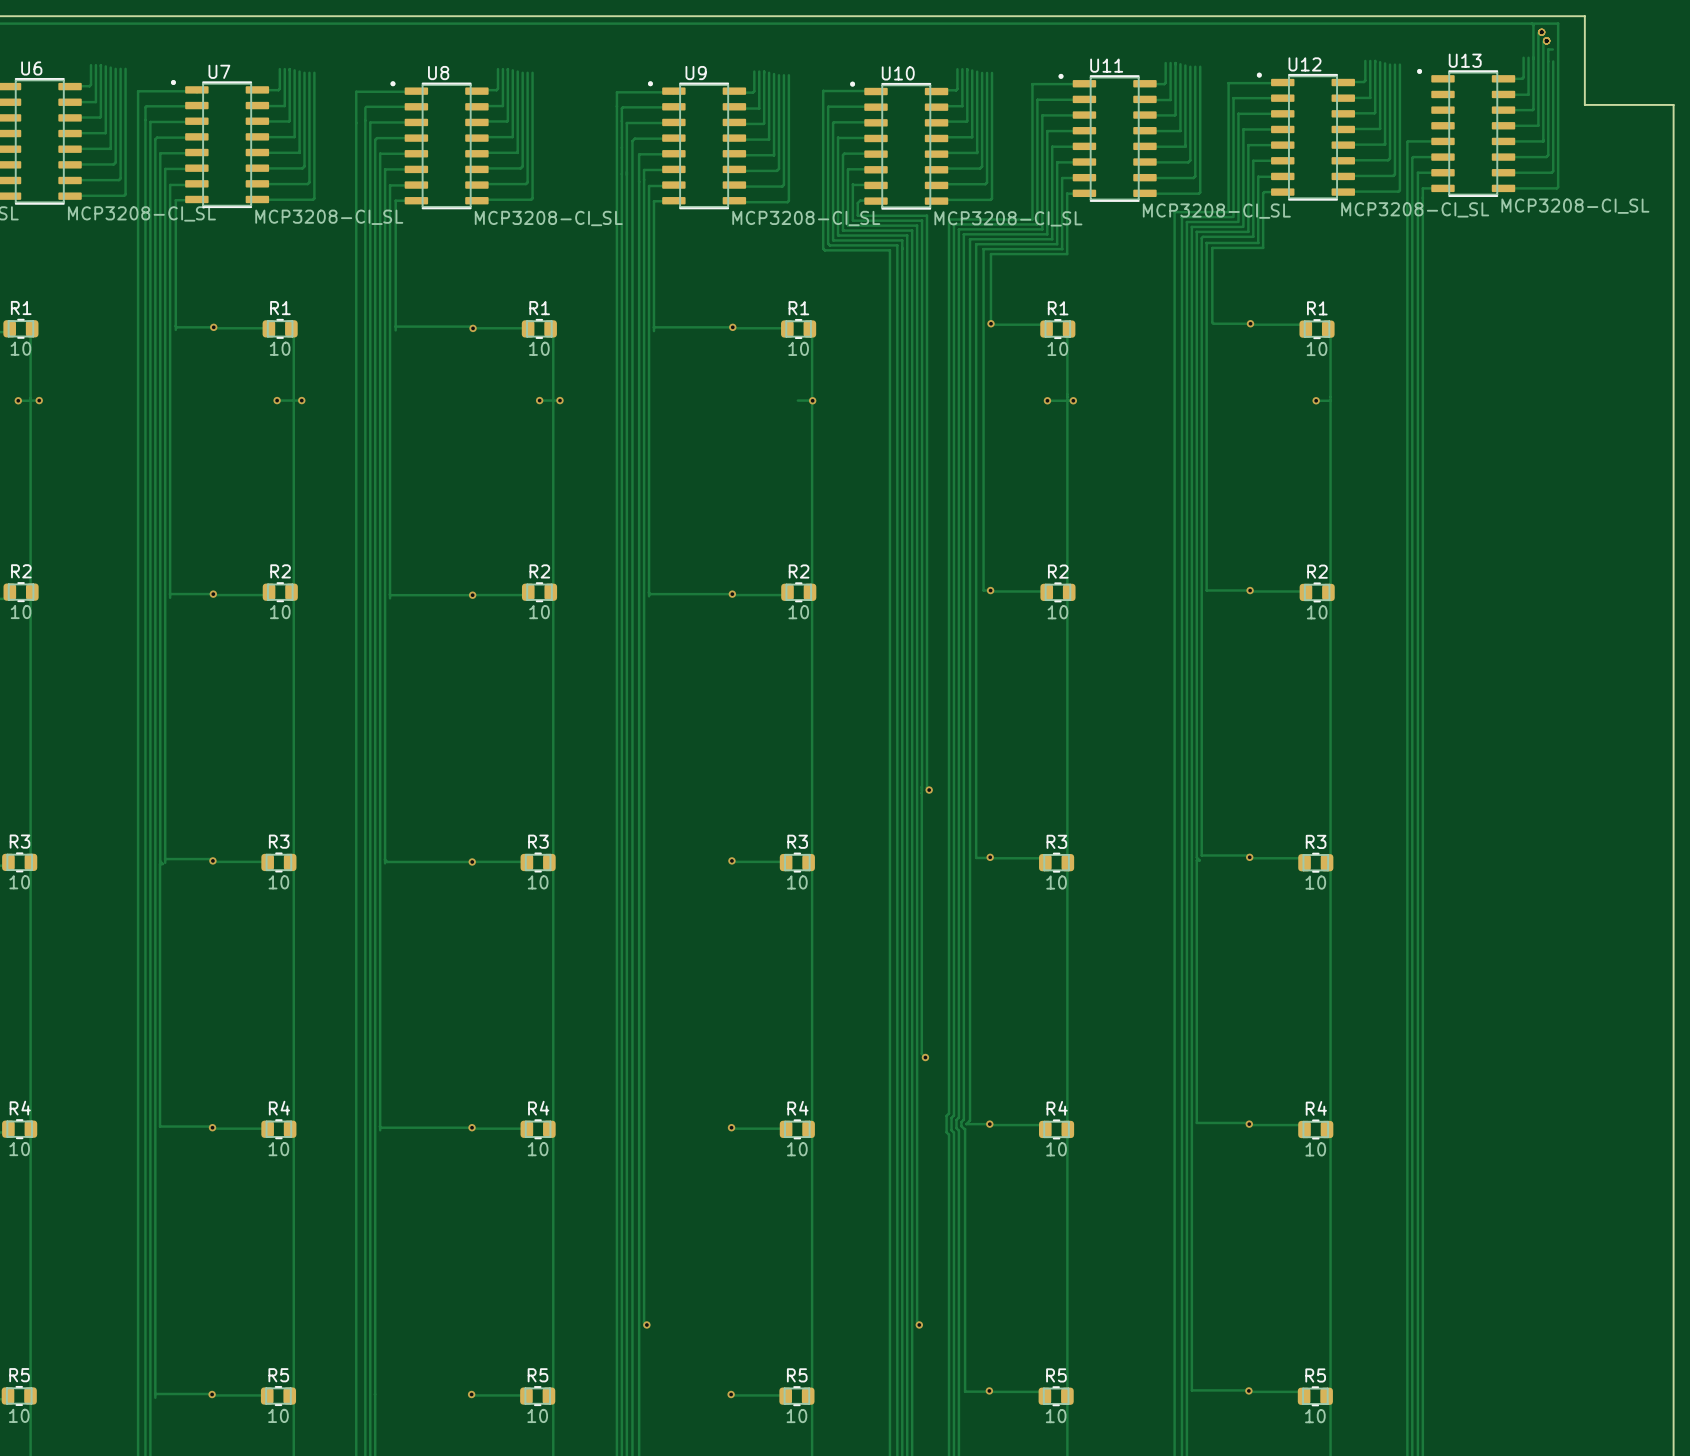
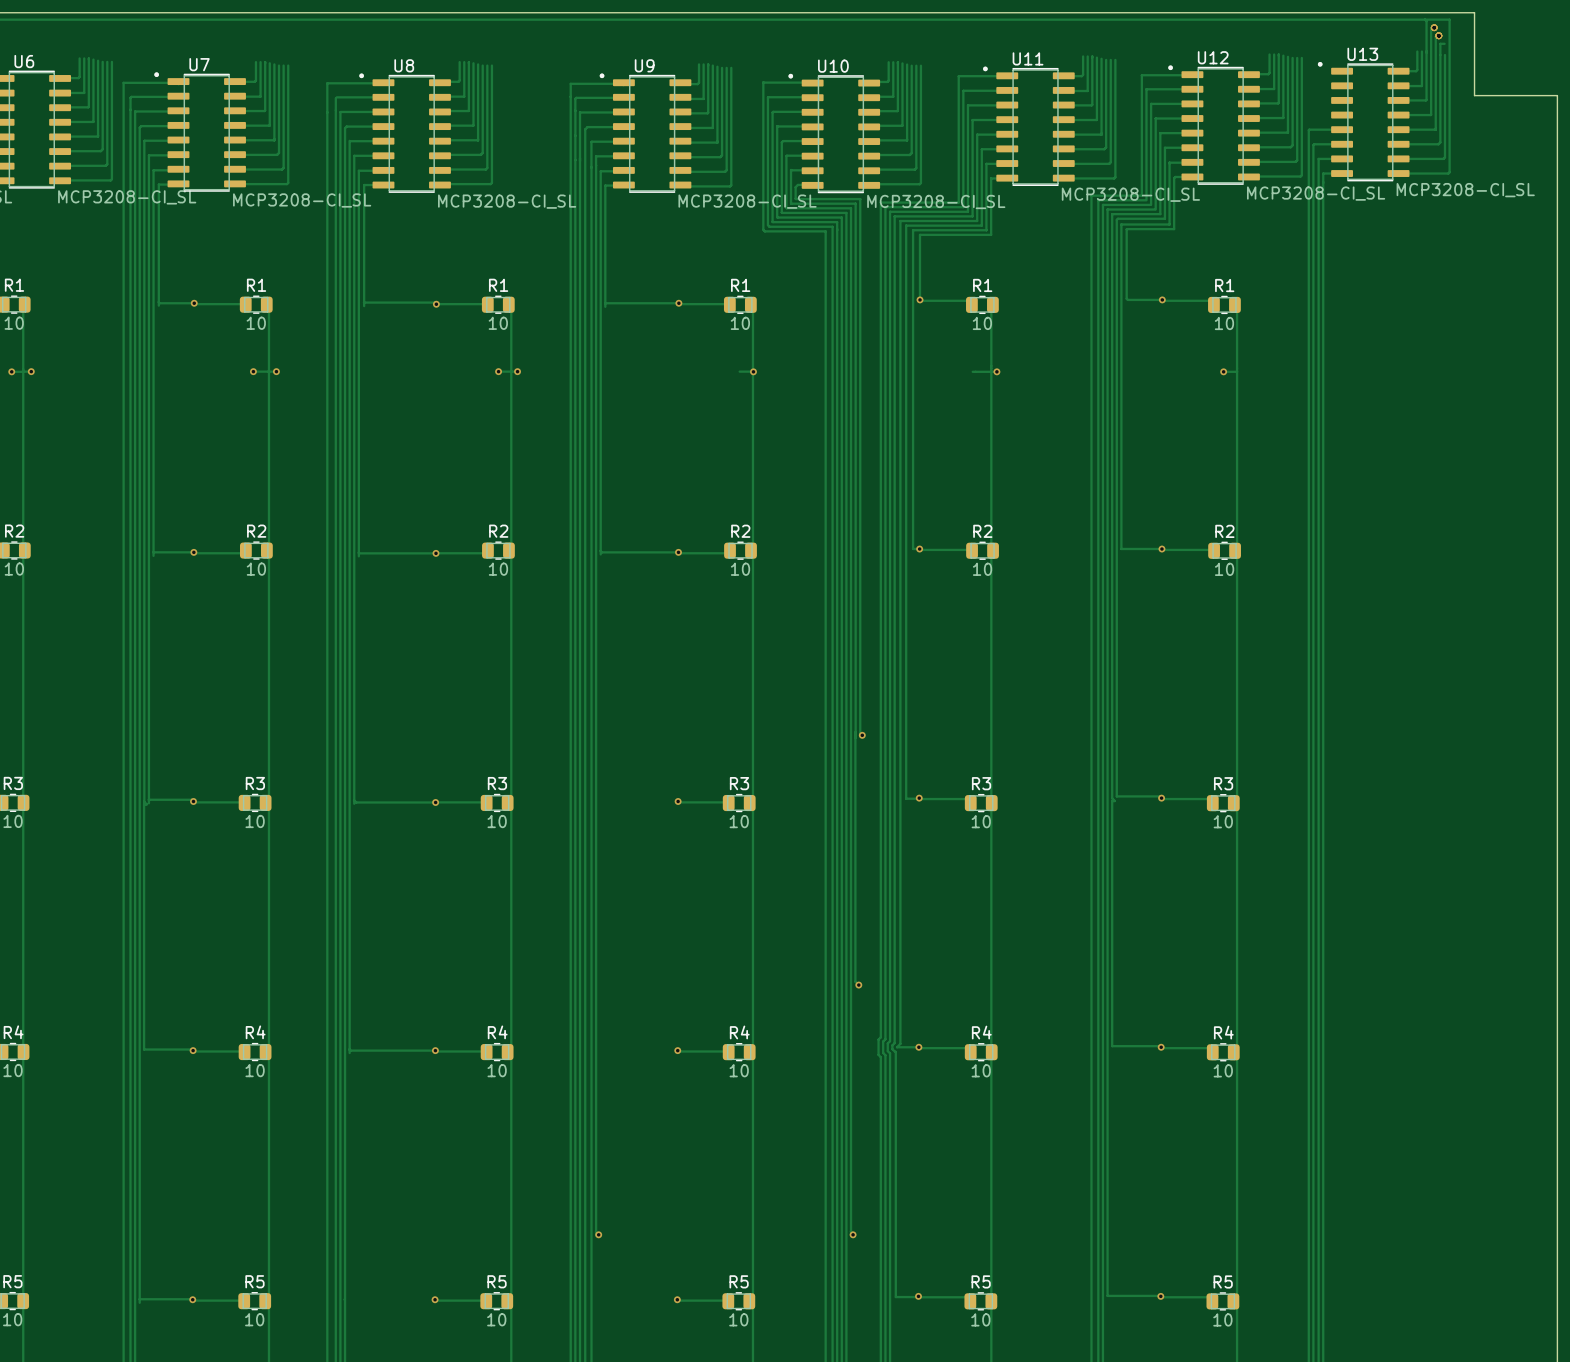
via: (1047, 400) -> none

